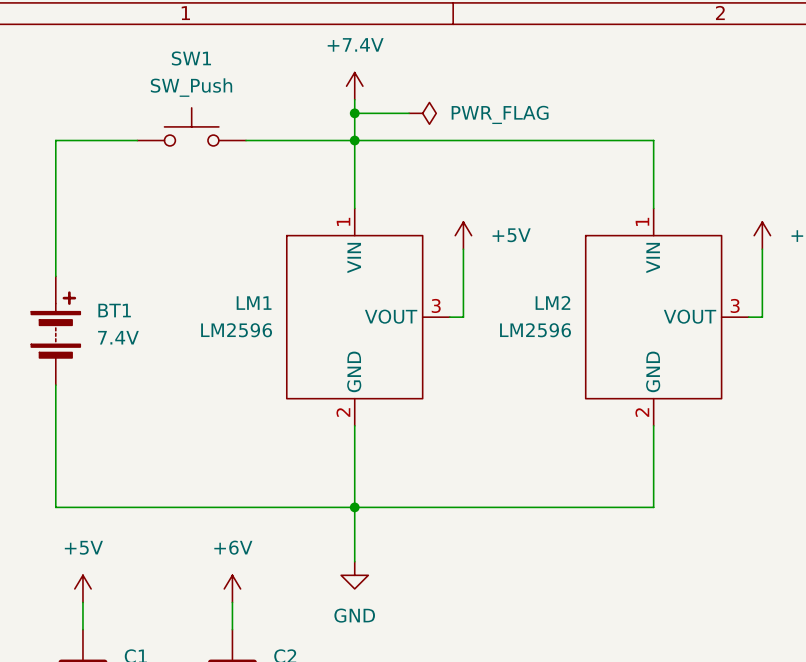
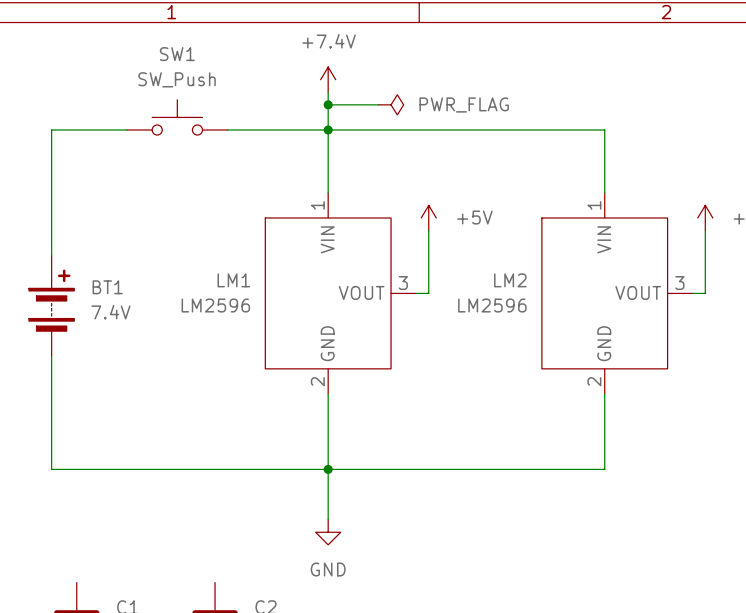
power symbol: +5V (82, 588) -> none
power symbol: +6V (232, 588) -> none
wire: (82, 602) (82, 629) -> none
wire: (232, 602) (232, 629) -> none

